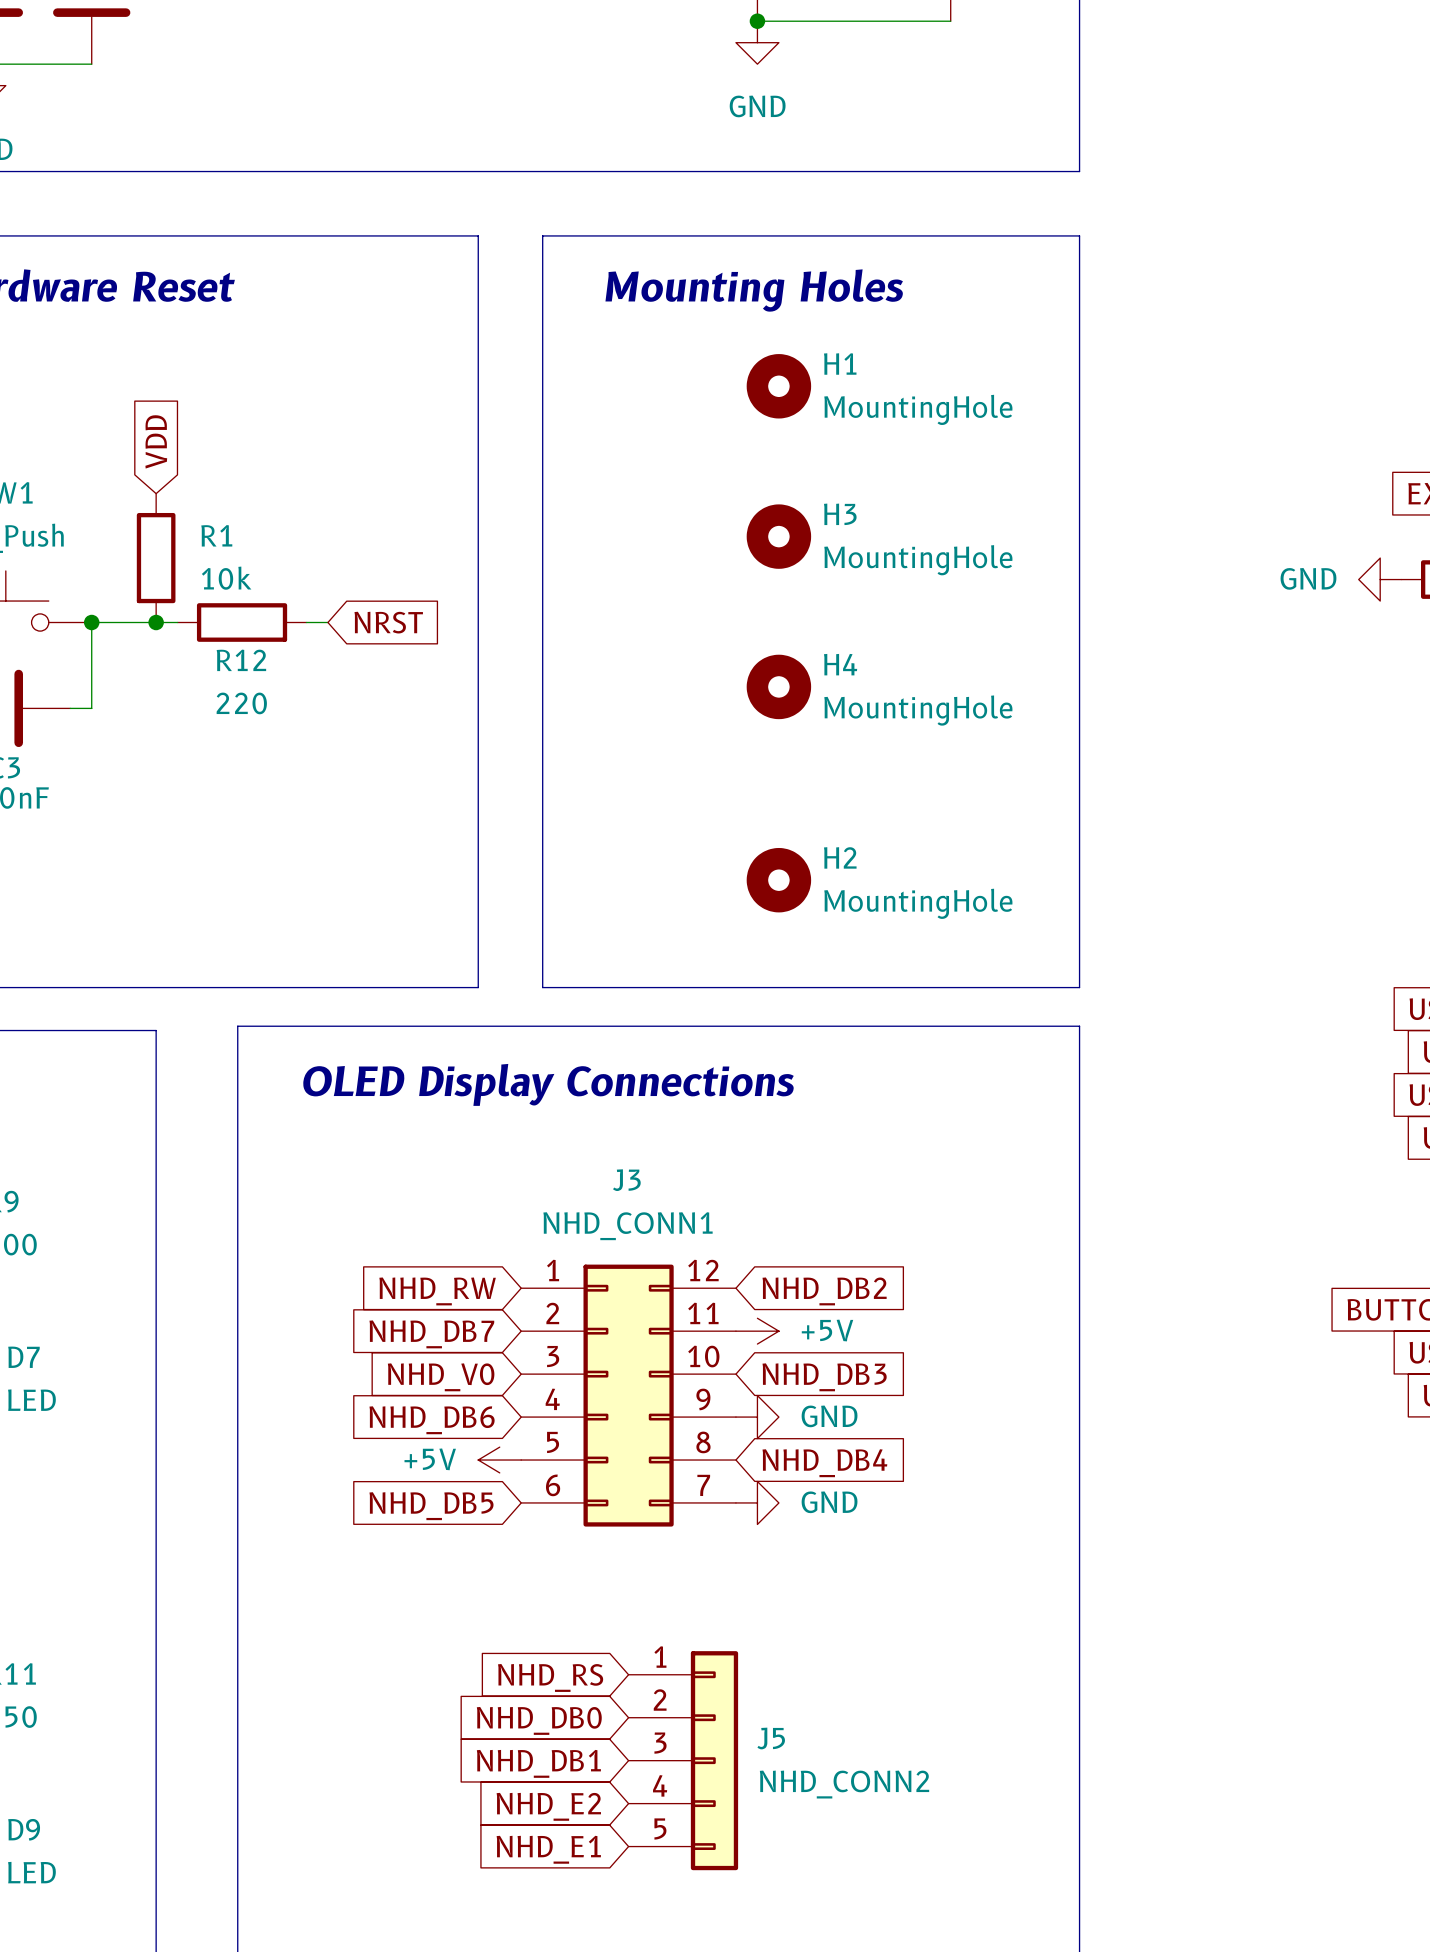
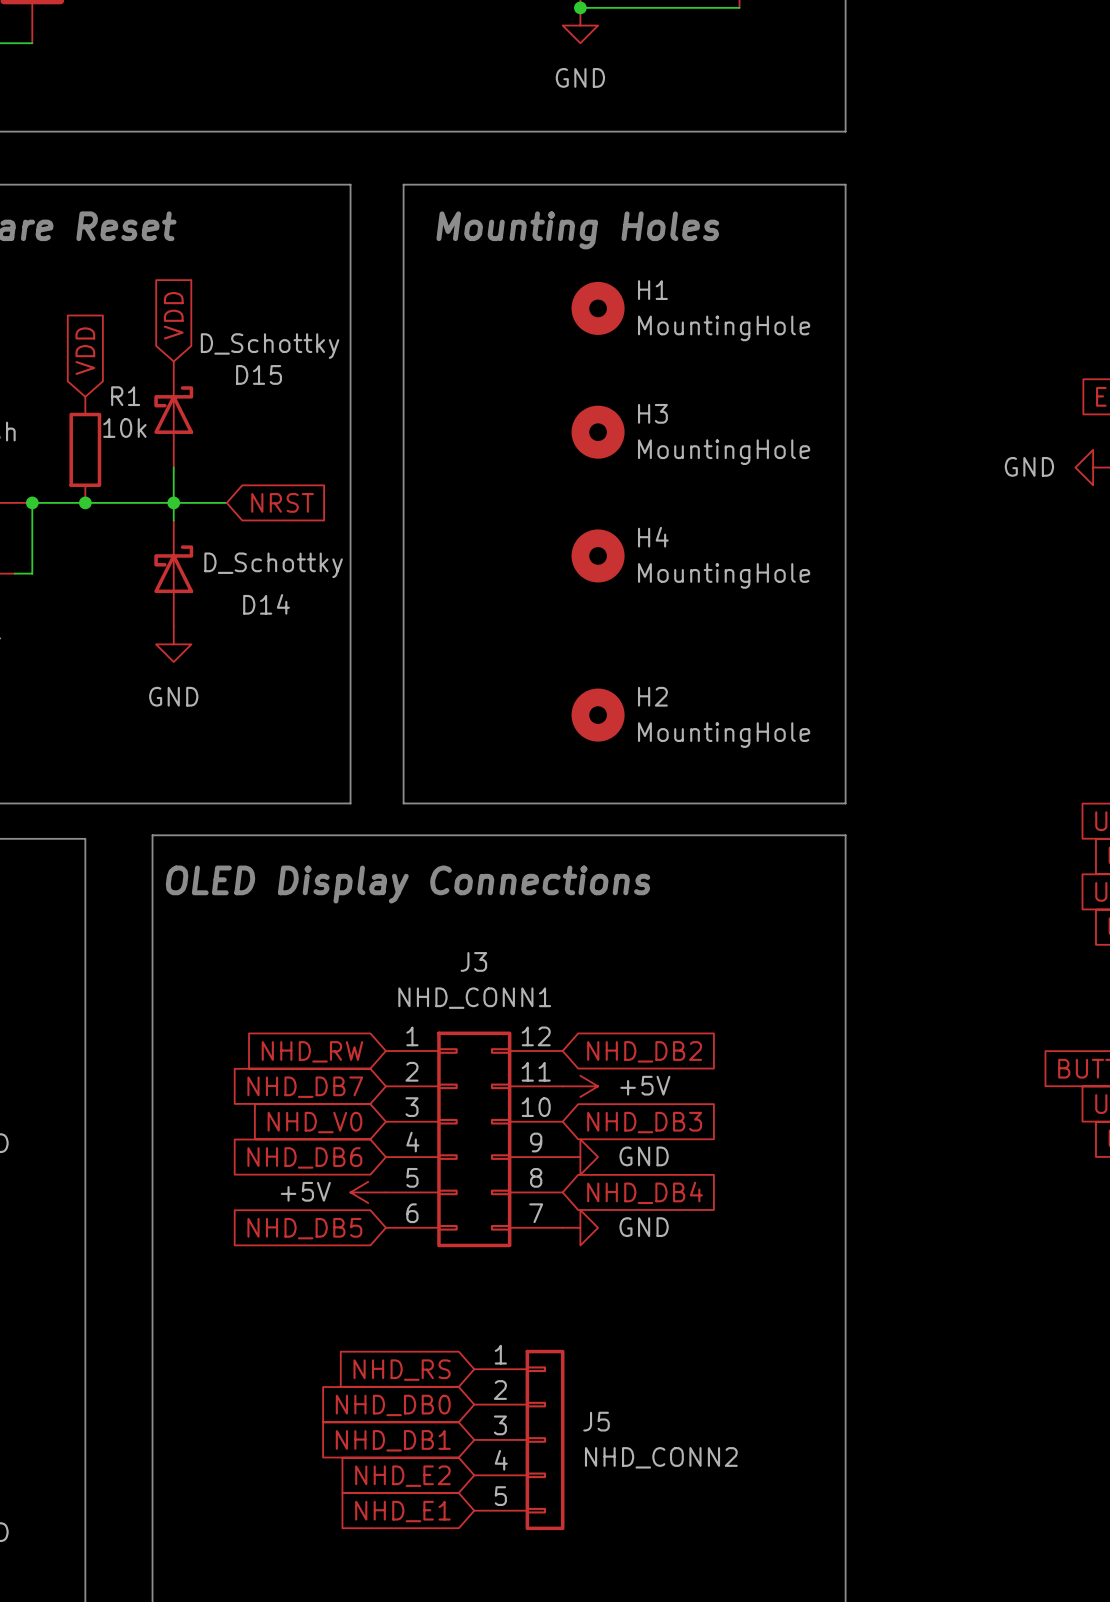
global label: none -> VDD (173, 315)
D15: none -> D_Schottky (173, 414)
R1 name position: R1 (216, 535) -> R1 (125, 396)
R1 value position: 10k (226, 578) -> 10k (124, 427)
wire: none -> (173, 467) (173, 520)
wire: none -> (103, 502) (209, 502)
R12: 220 (242, 622) -> none
junction: none -> (173, 502)
D14: none -> D_Schottky (173, 573)
power symbol: none -> GND (173, 644)

